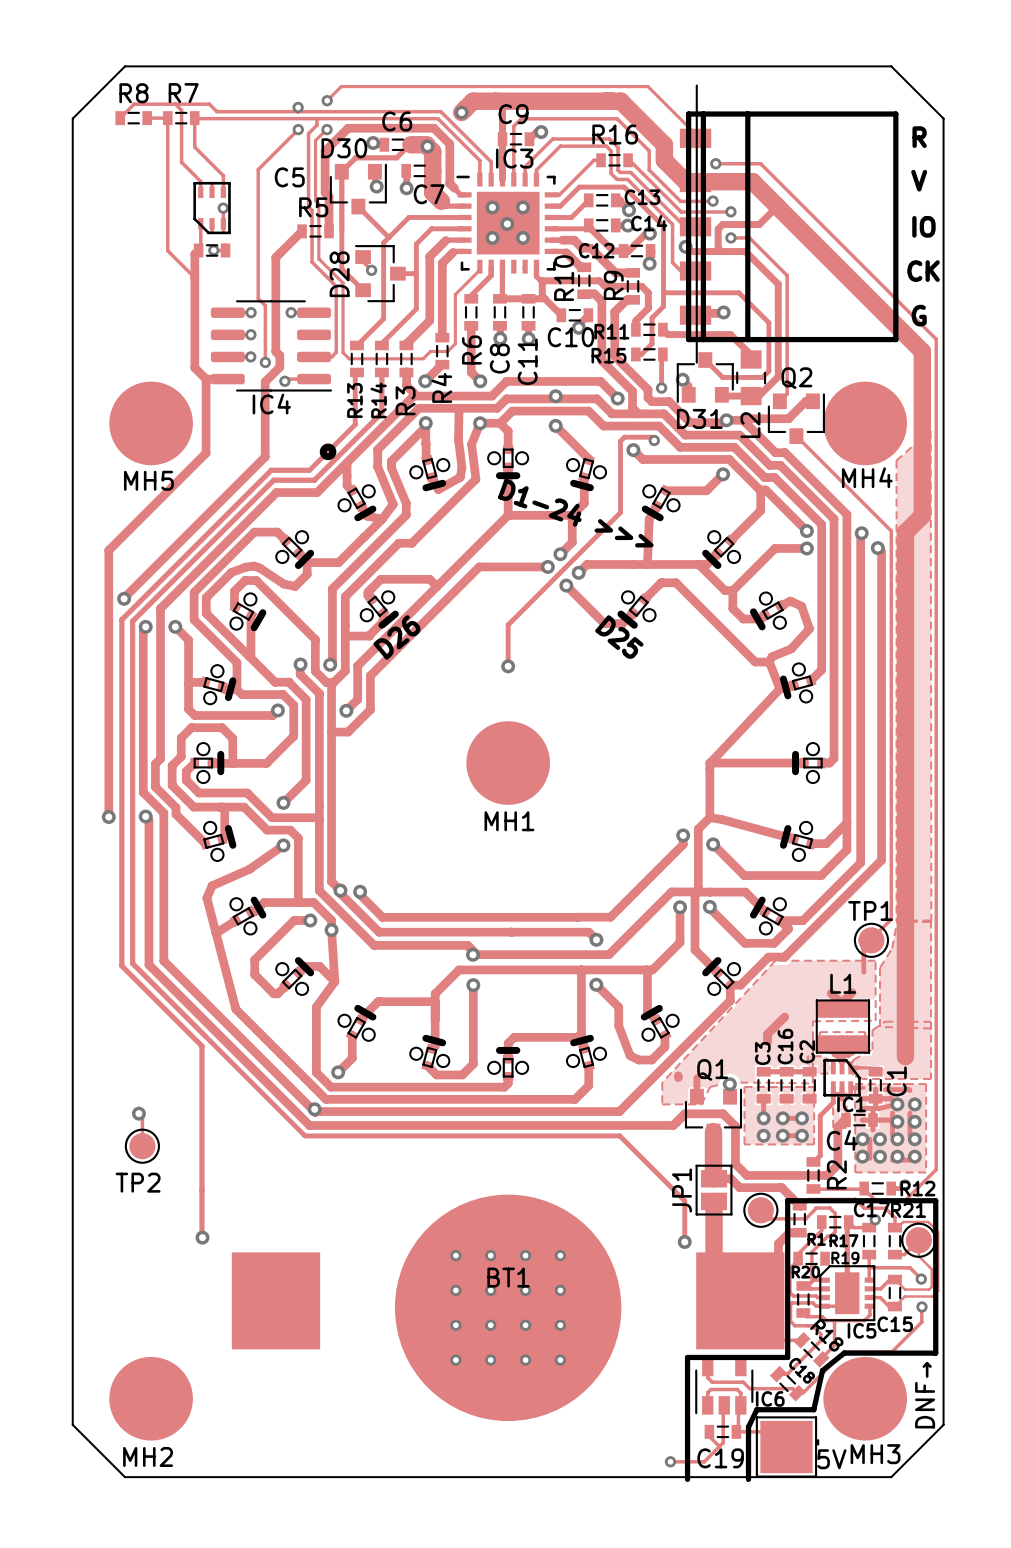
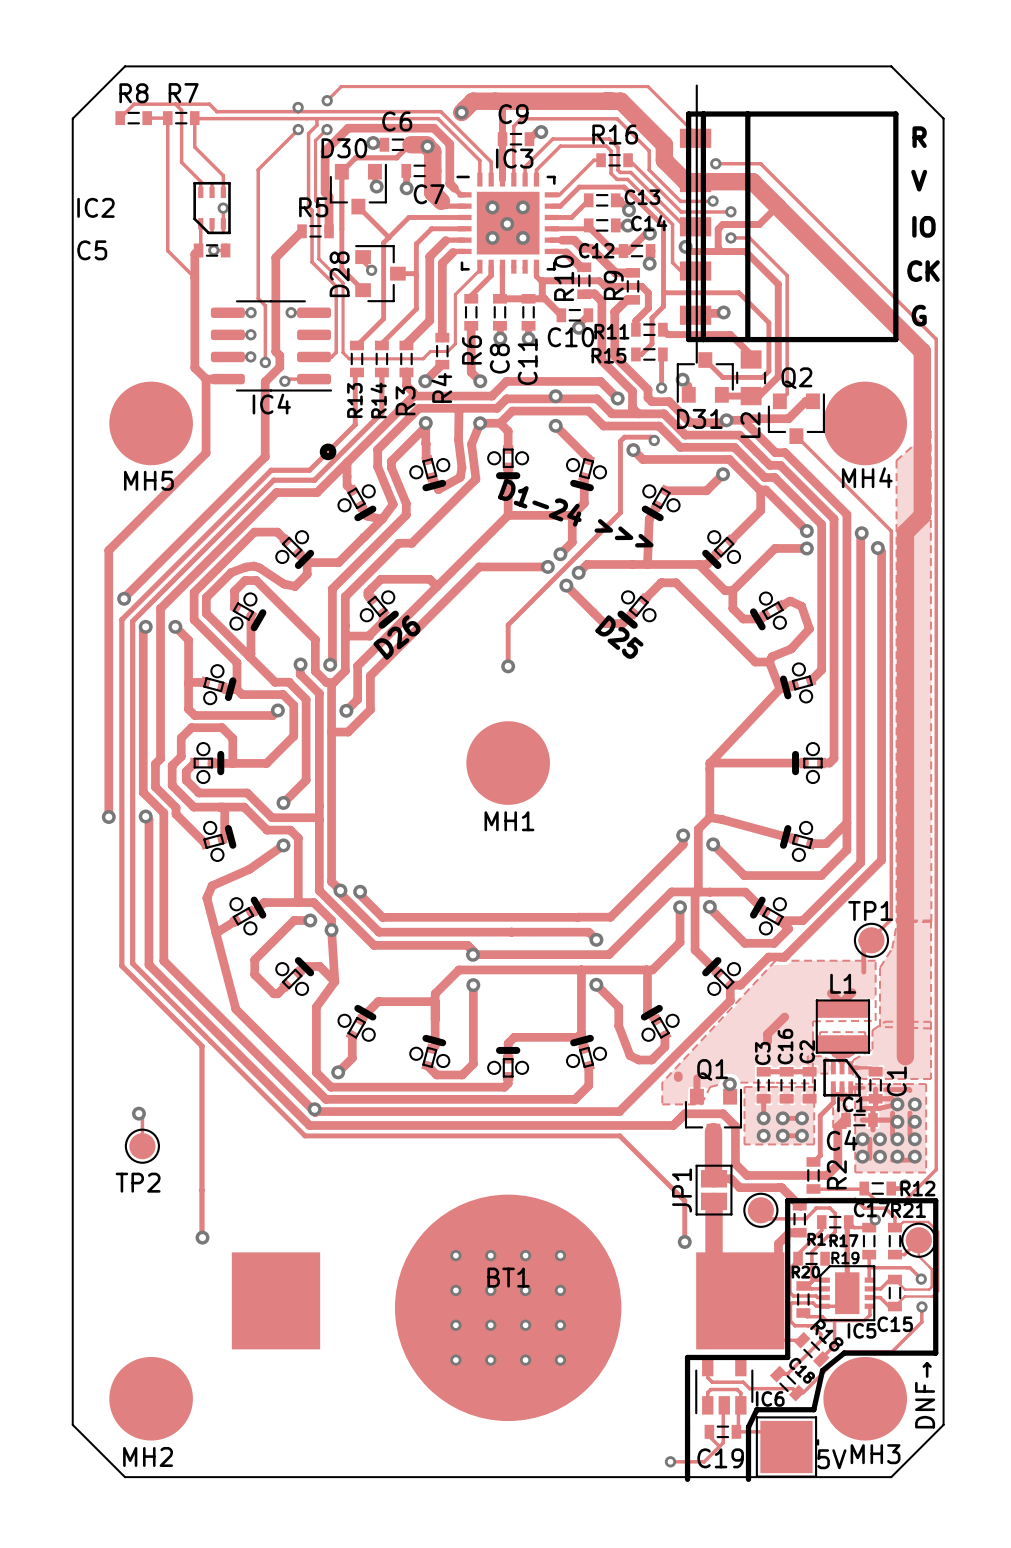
C5 name position: C5 (289, 177) -> C5 (92, 250)
IC2 name: none -> IC2 (95, 207)

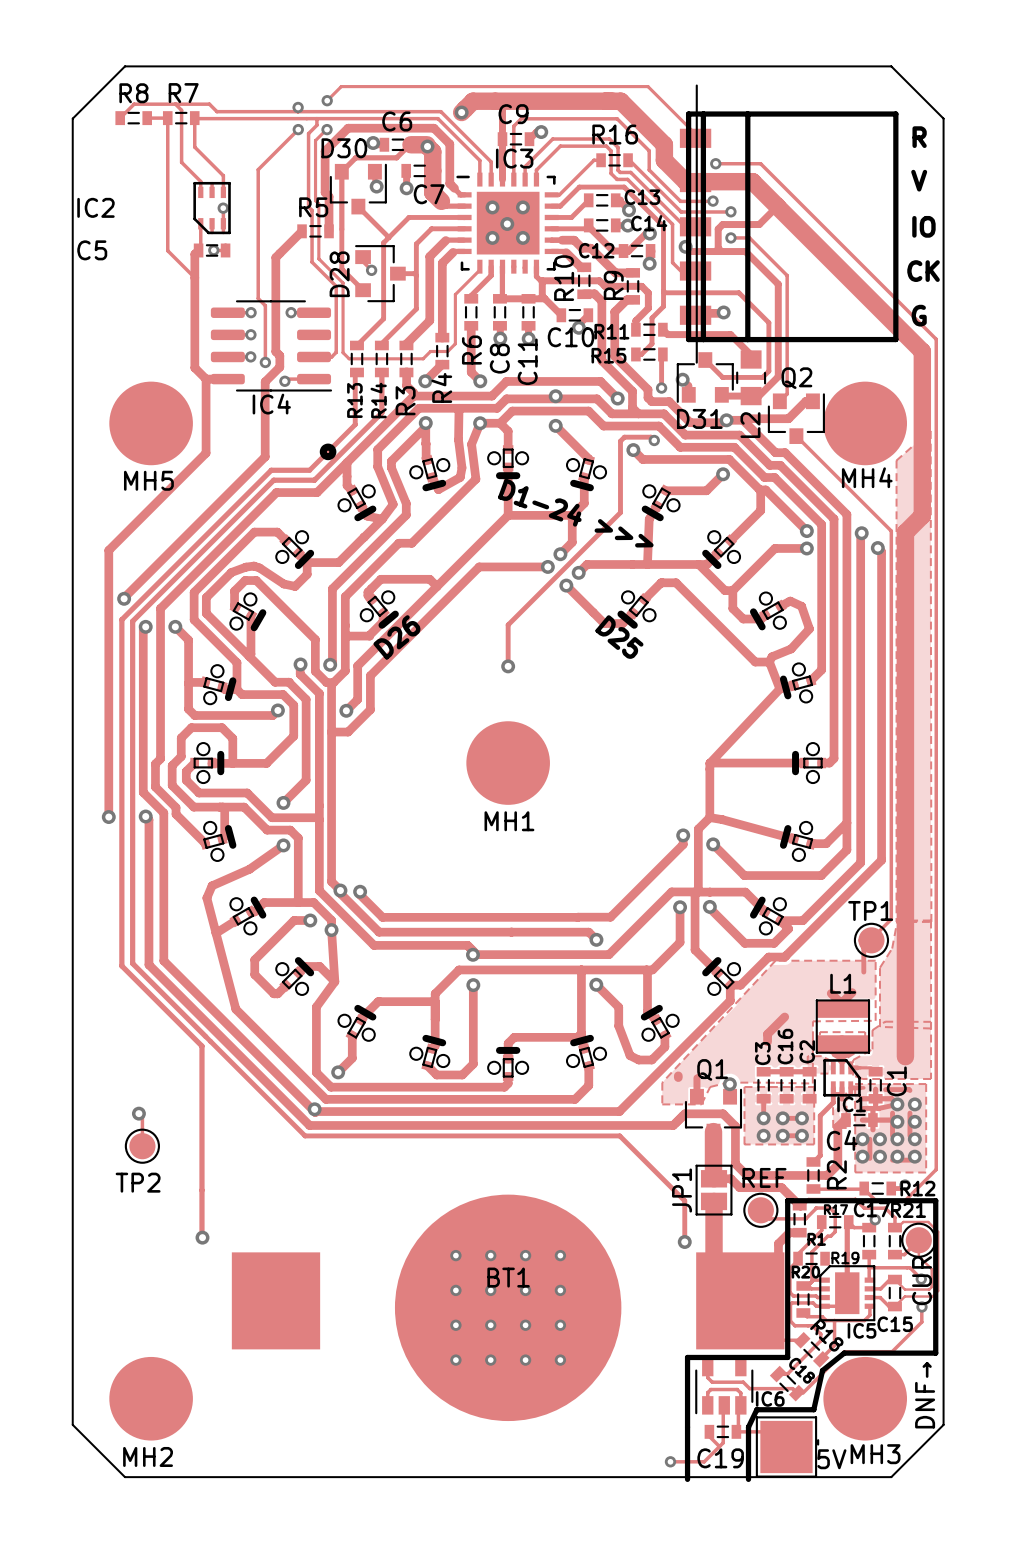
text: none -> REF (764, 1177)
R17 name position: R17 (843, 1240) -> R17 (836, 1209)
text: none -> CUR (922, 1280)

